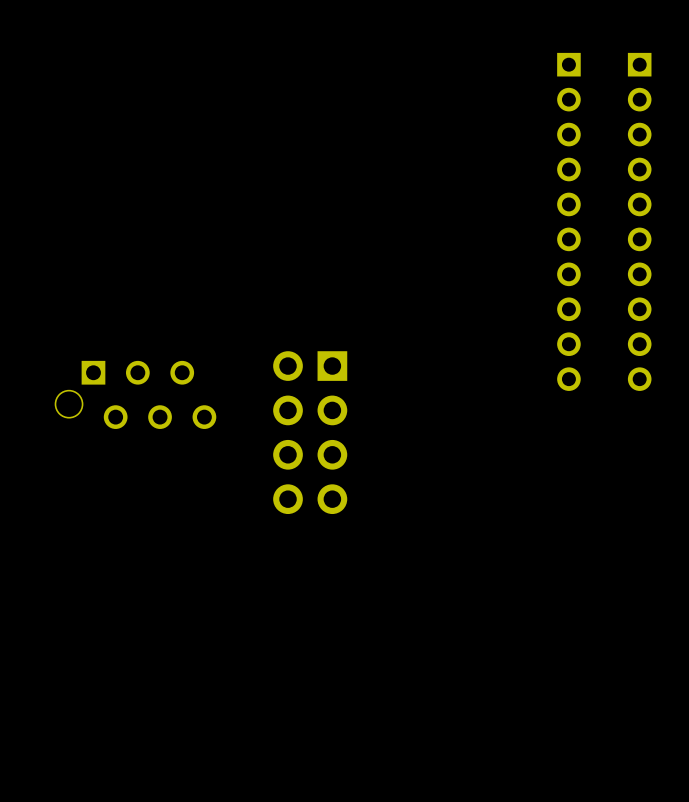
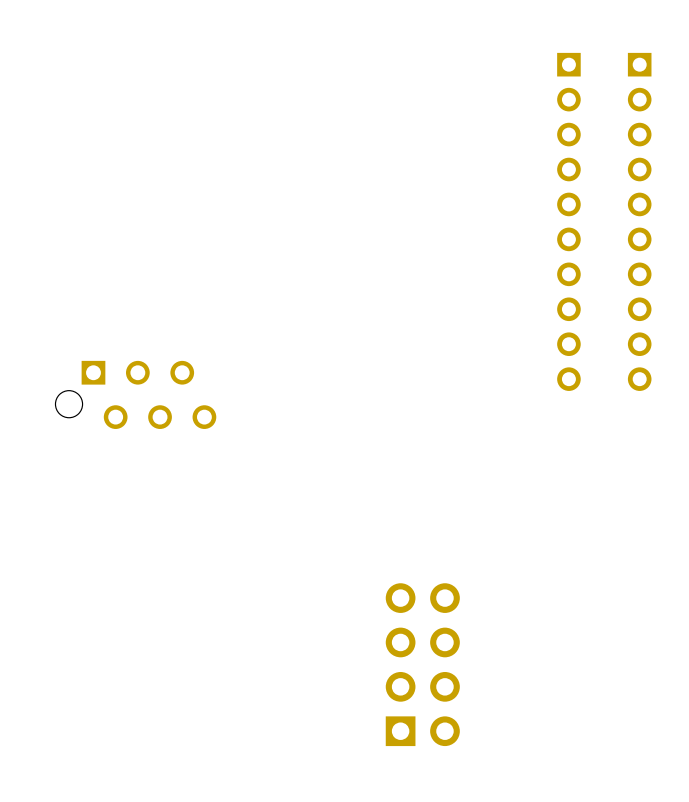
part rotation: 0° (310, 432) -> 180° (422, 664)
part position: (310, 432) -> (422, 664)

